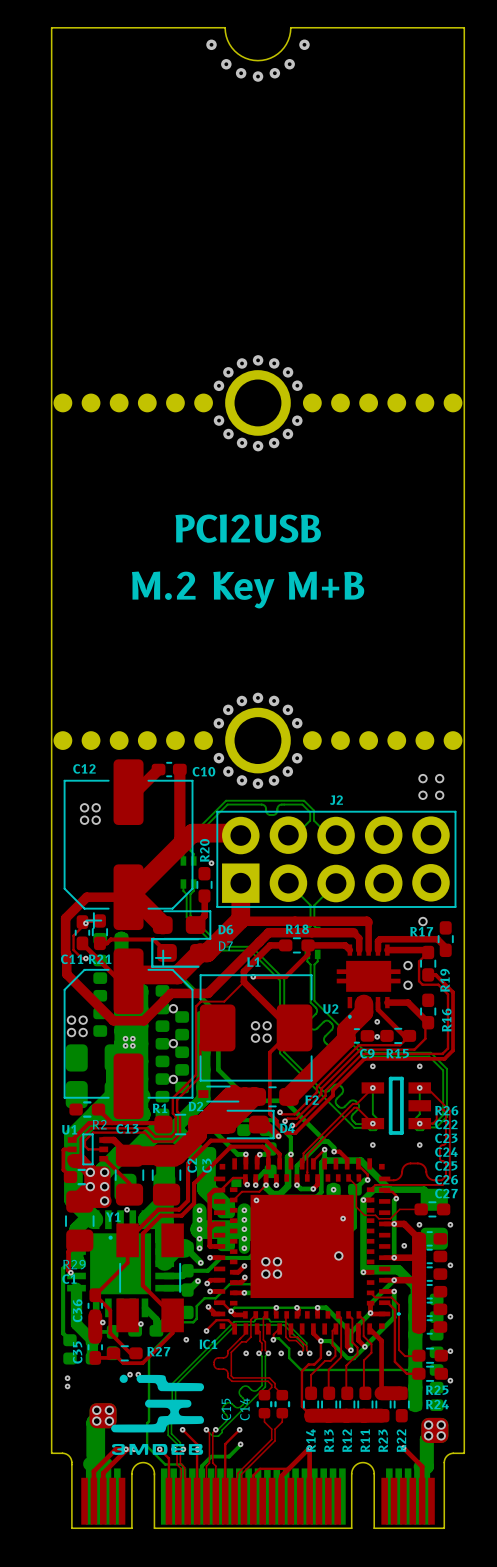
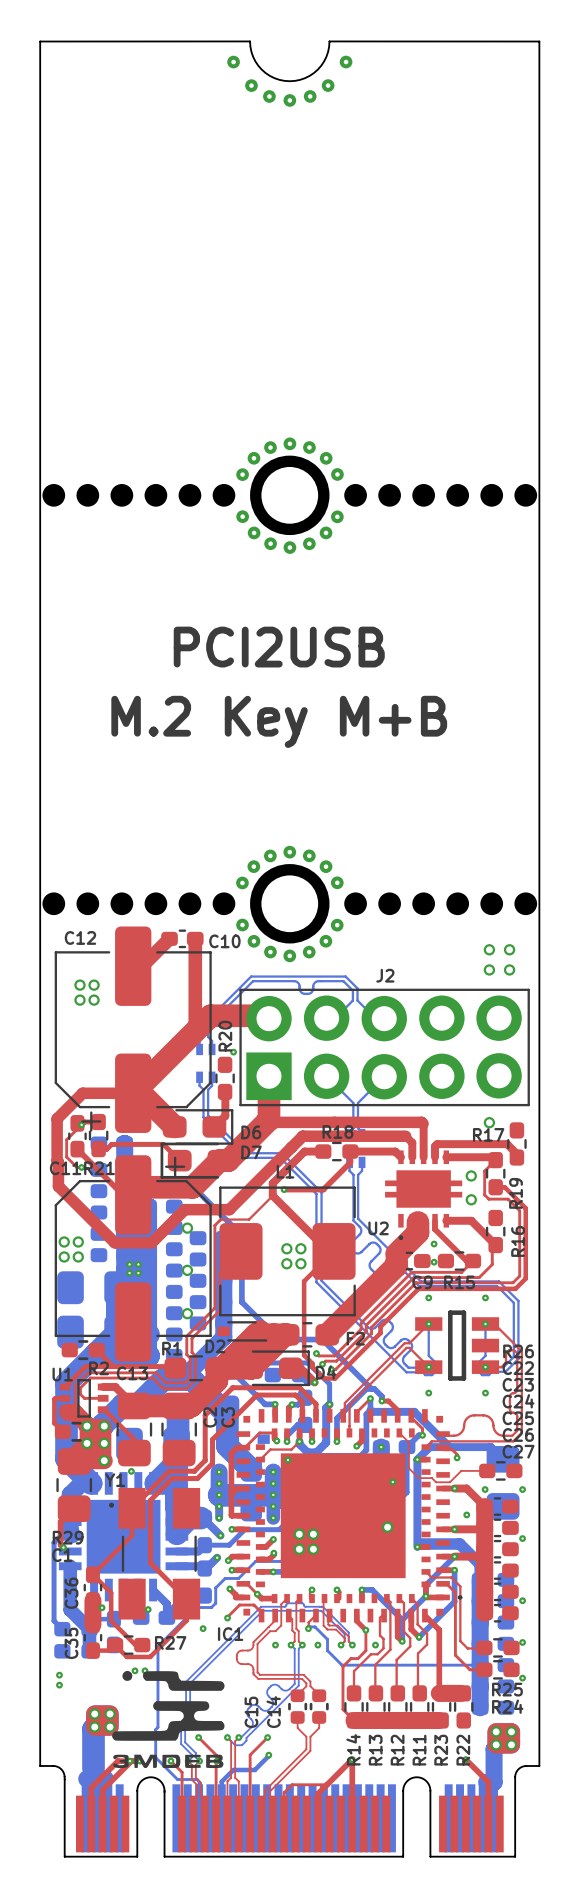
bottom track: (296, 1185) (300, 1188) (313, 1188) -> none
bottom track: (396, 1198) (394, 1200) (394, 1257) -> none
bottom track: (317, 1307) (234, 1307) (231, 1311) -> none
bottom track: (320, 1341) (330, 1341) (347, 1358) (353, 1358) (364, 1346) -> none

